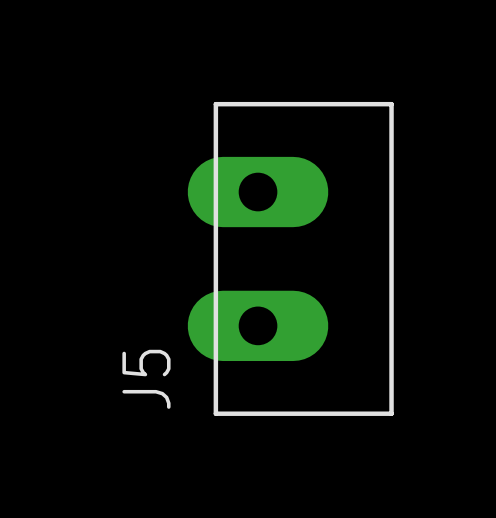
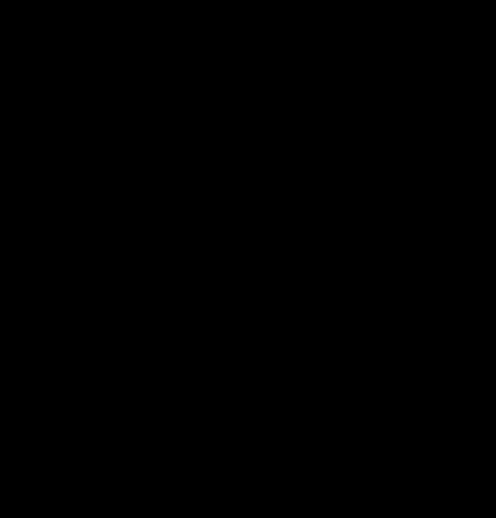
J5: (290, 258) -> none

